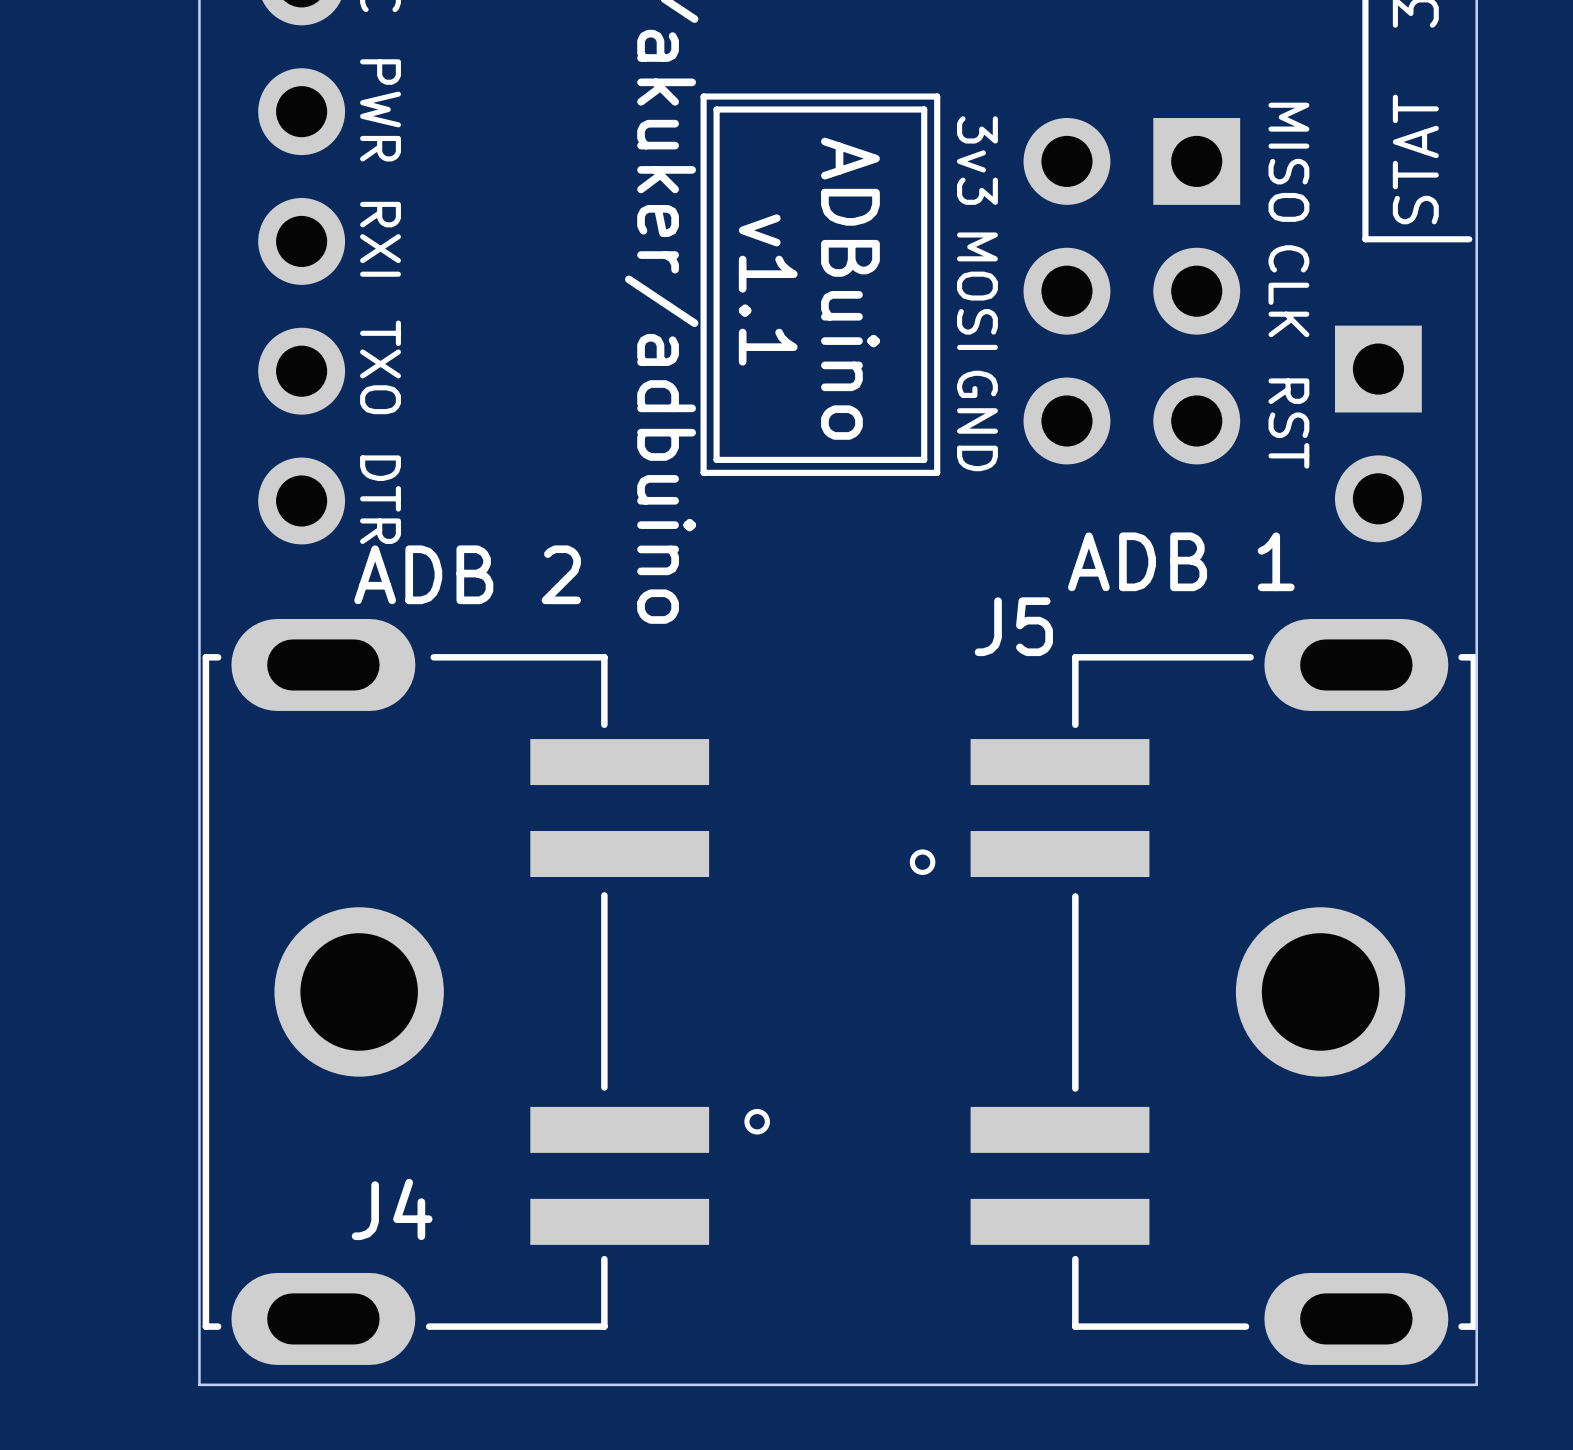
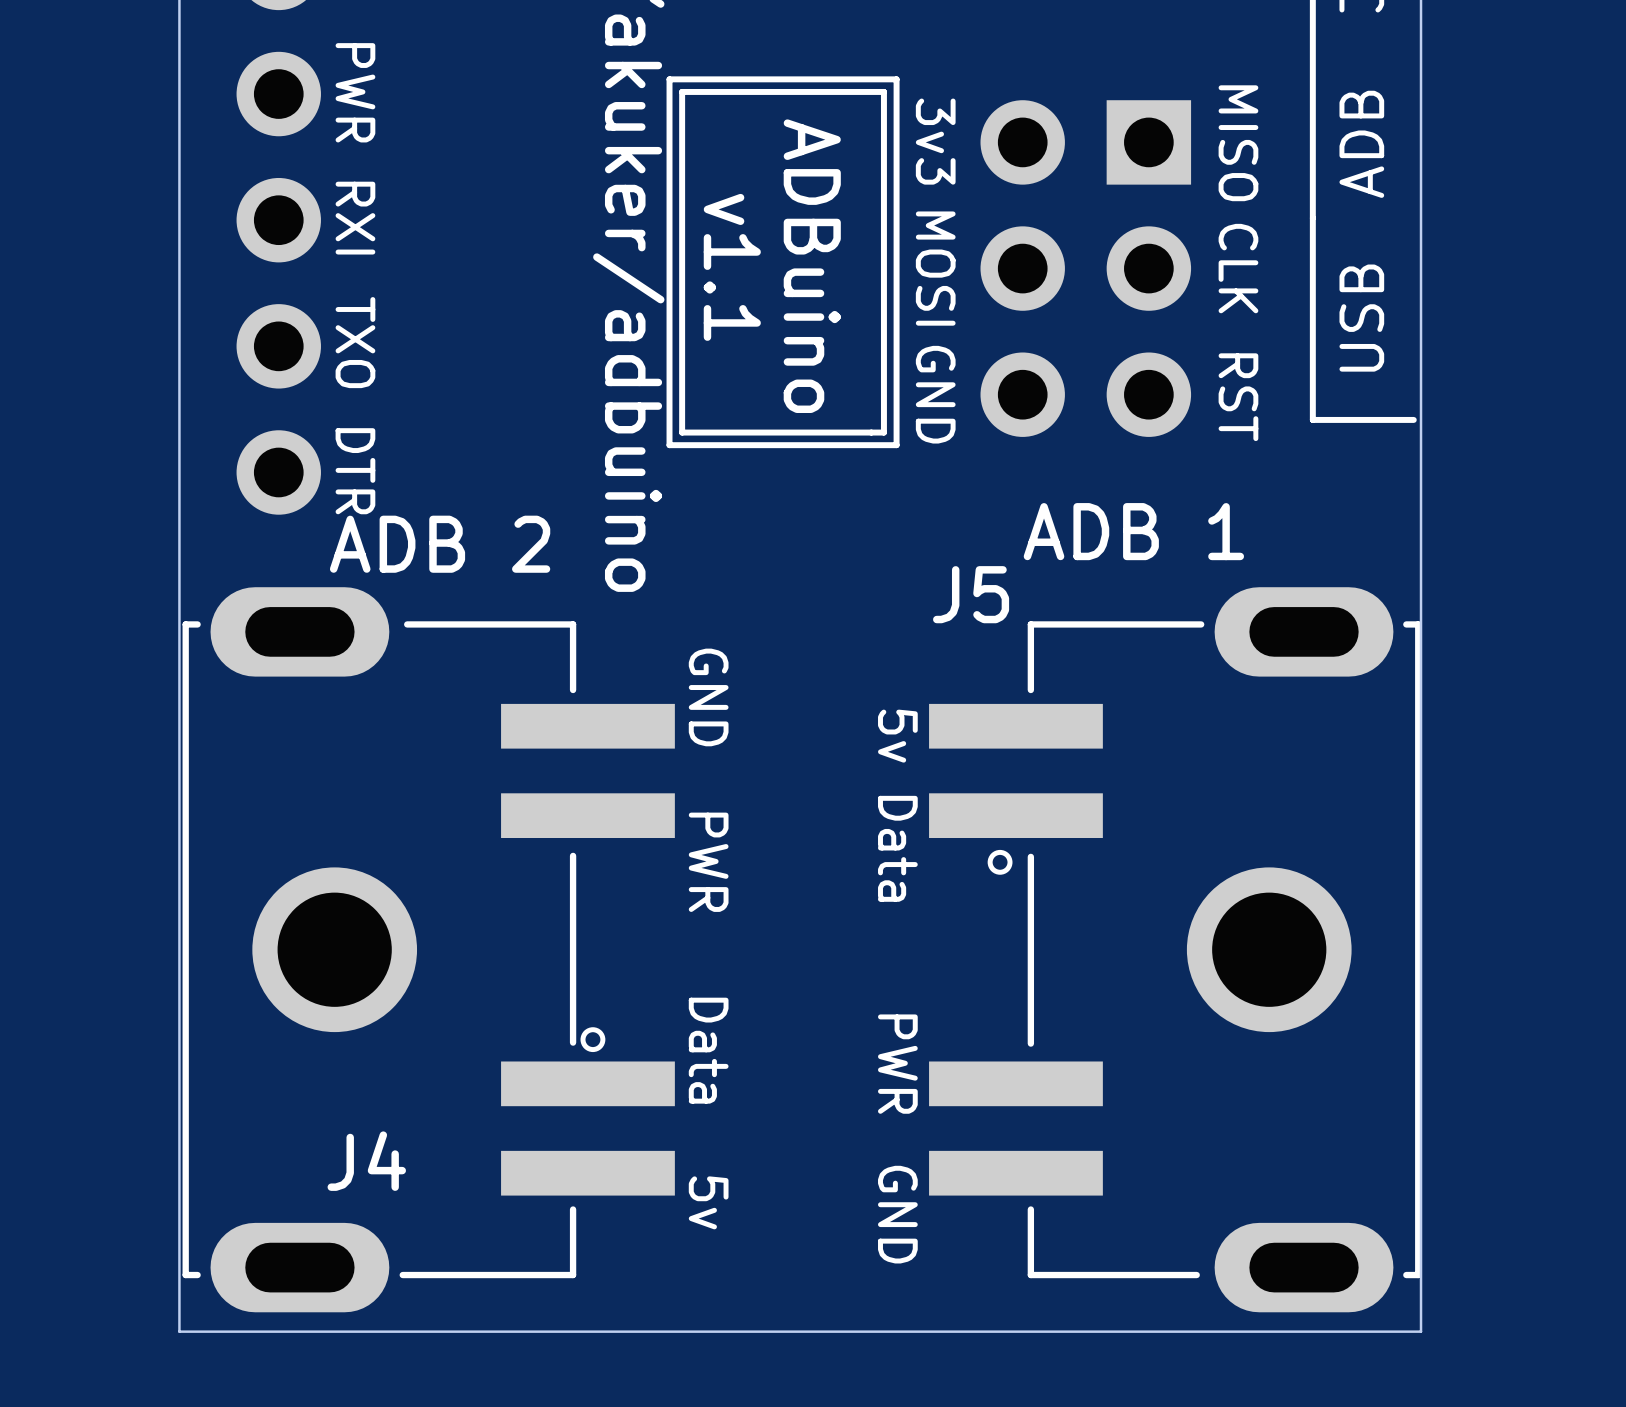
text: STAT (1415, 159) -> ADB (1361, 144)
line: (1469, 239) (1365, 239) -> (1413, 419) (1312, 419) (1312, 218)
text: none -> USB (1361, 318)
part: (1378, 433) -> none
J4 footprint: [202, 618, 770, 1365] -> [182, 587, 675, 1313]
J5 footprint: [909, 618, 1478, 1365] -> [929, 587, 1422, 1313]
text: none -> GND (708, 697)
text: none -> 5v (897, 736)
text: none -> Data (897, 848)
text: none -> PWR (708, 862)
text: none -> Data (708, 1050)
text: none -> PWR (897, 1064)
text: none -> 5v (708, 1202)
text: none -> GND (897, 1214)

